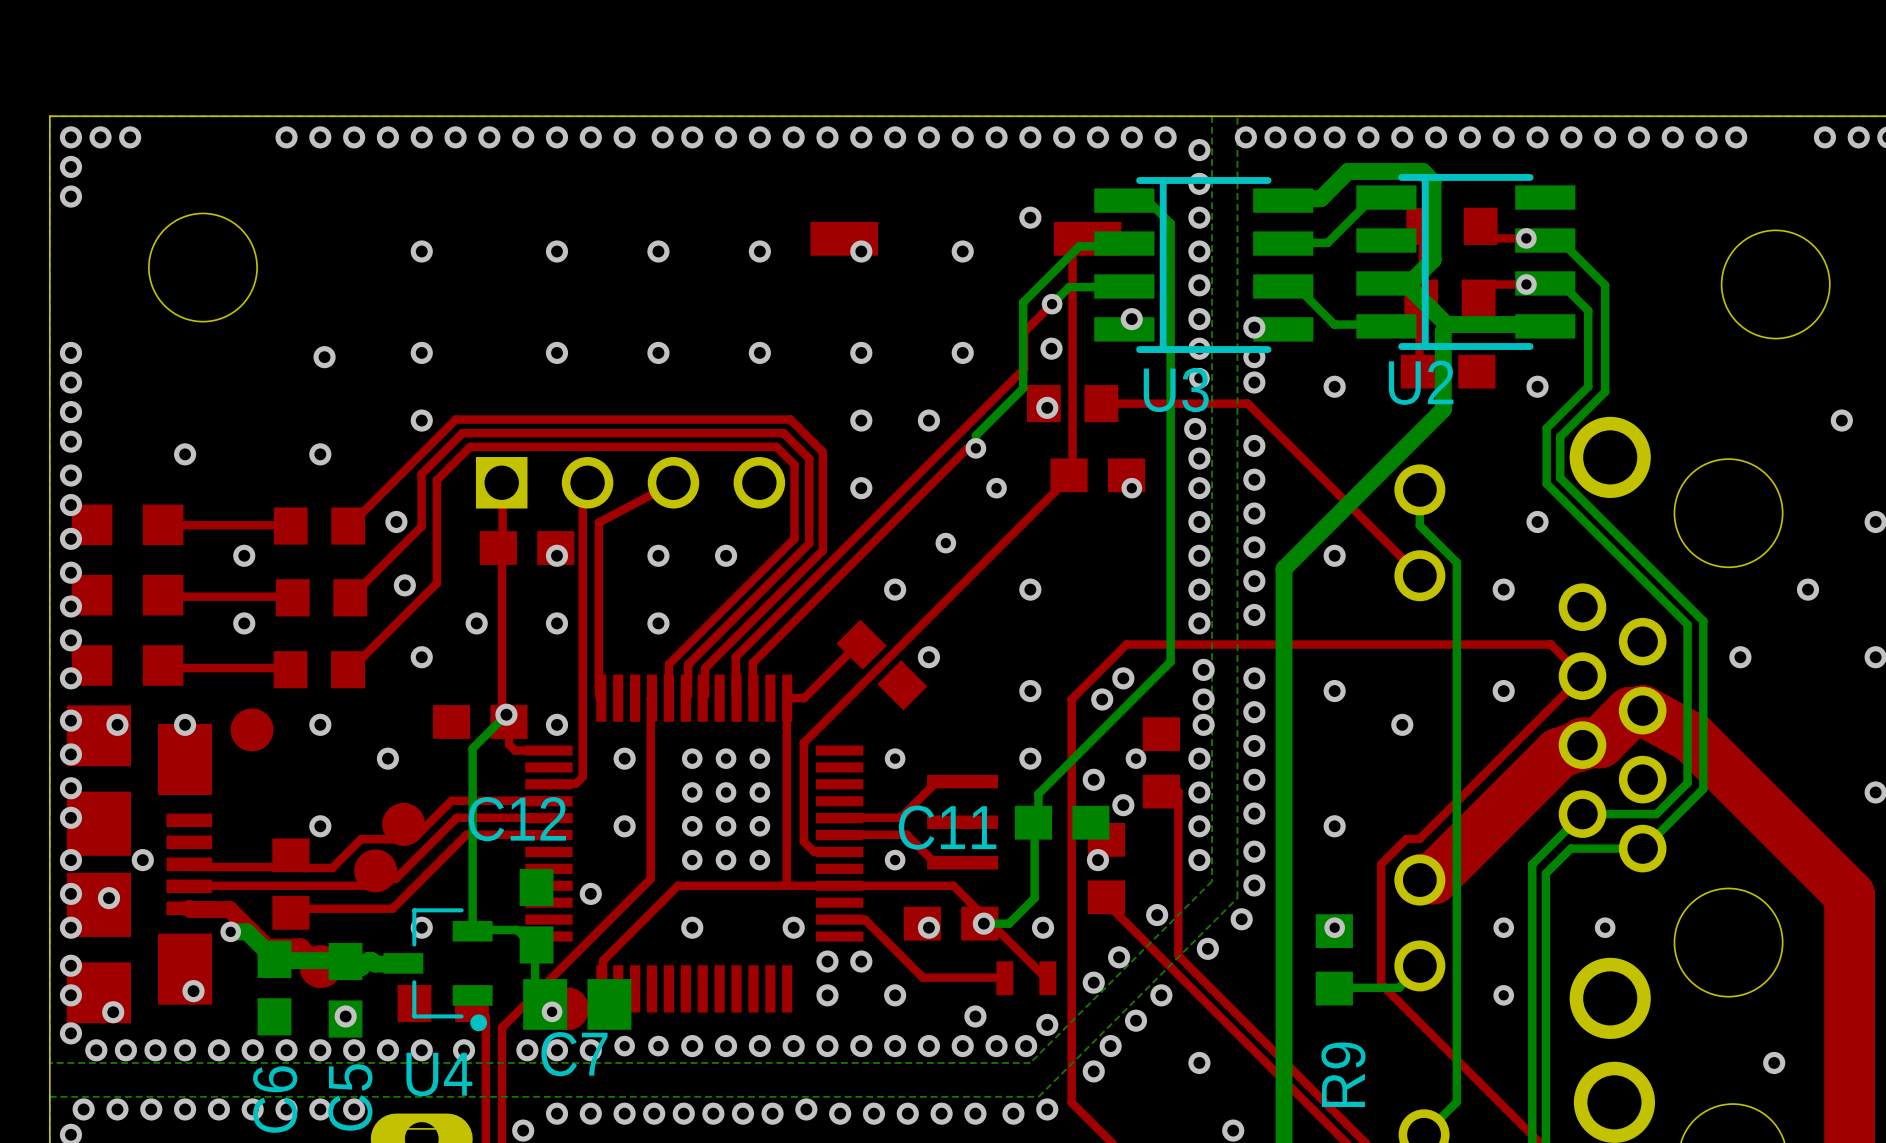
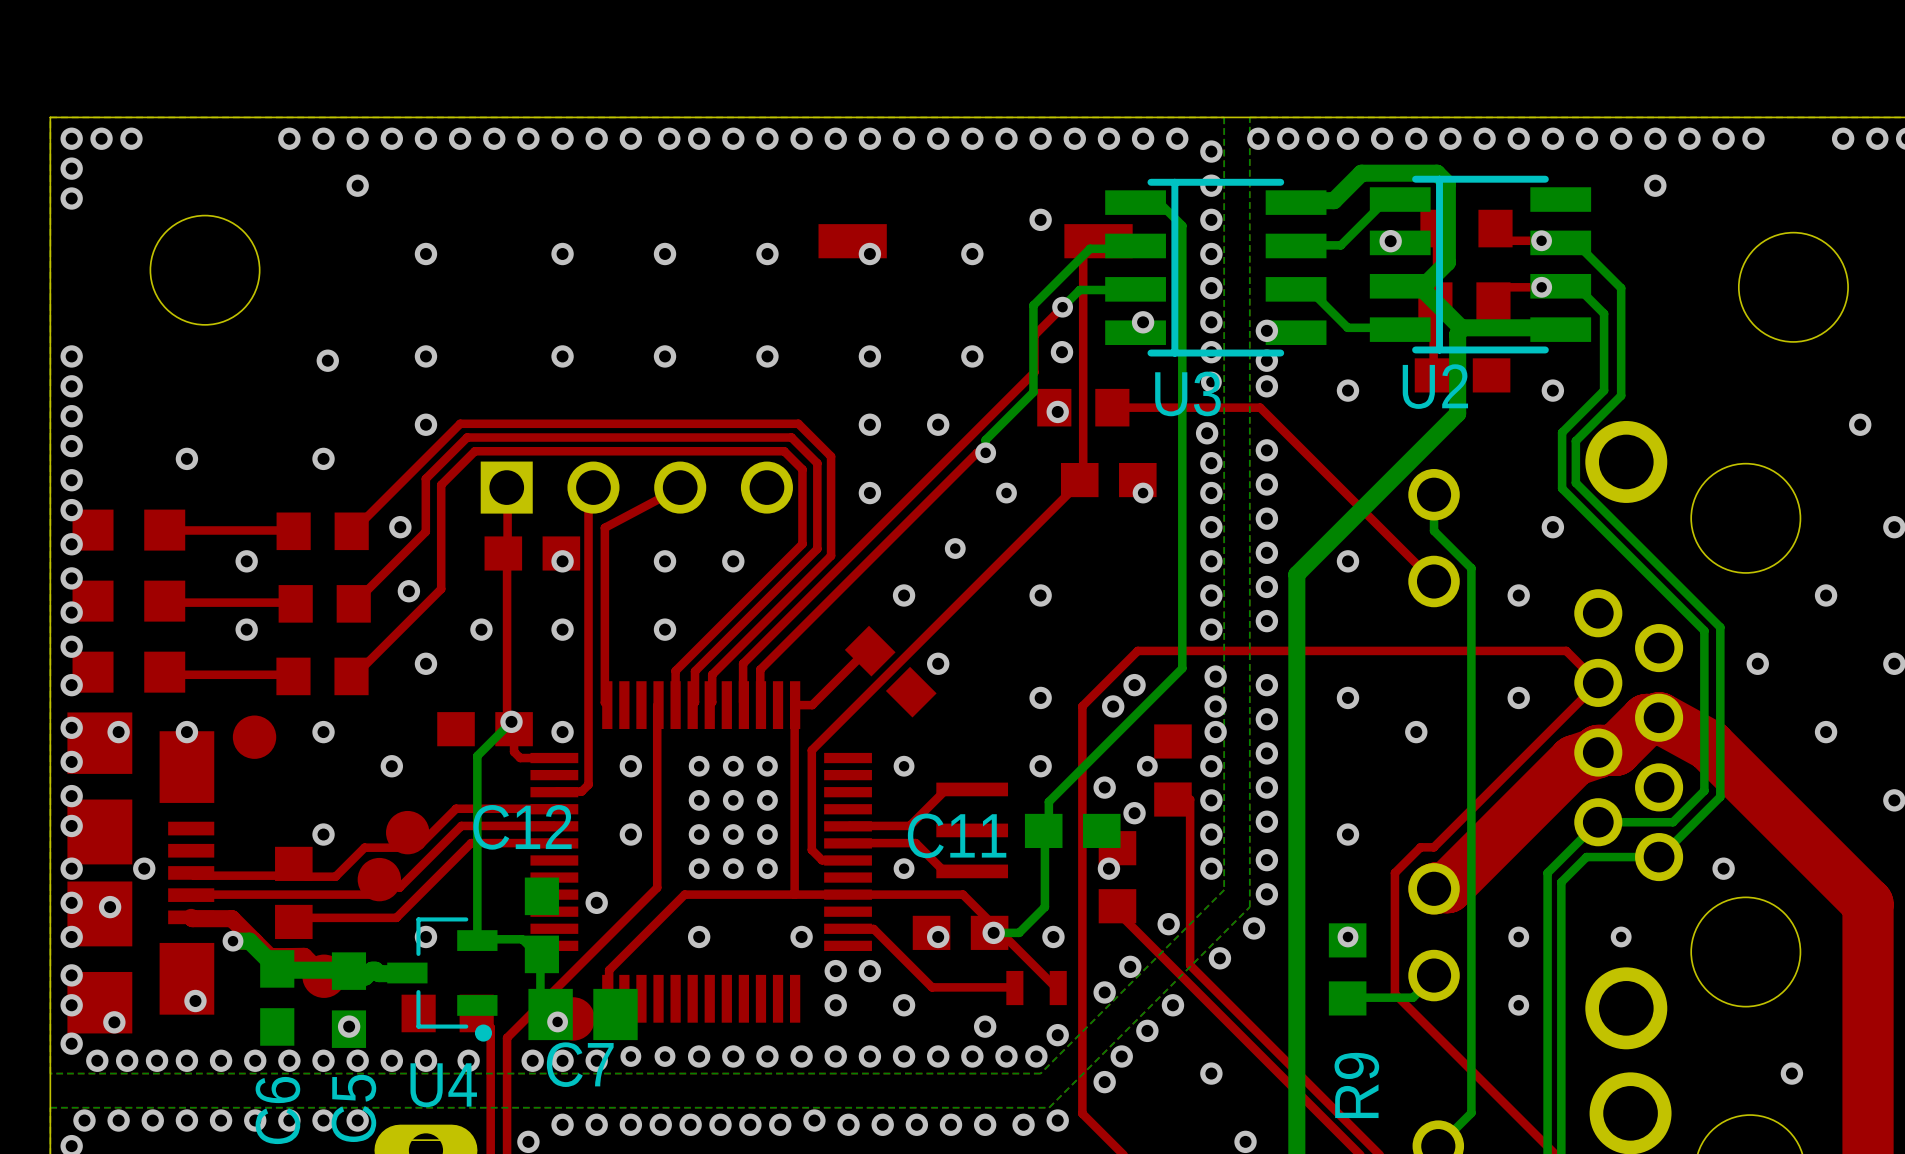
via: none -> (357, 185)
via: none -> (1655, 185)
via: none -> (1390, 241)
via: none -> (1826, 732)
via: none -> (1723, 868)

